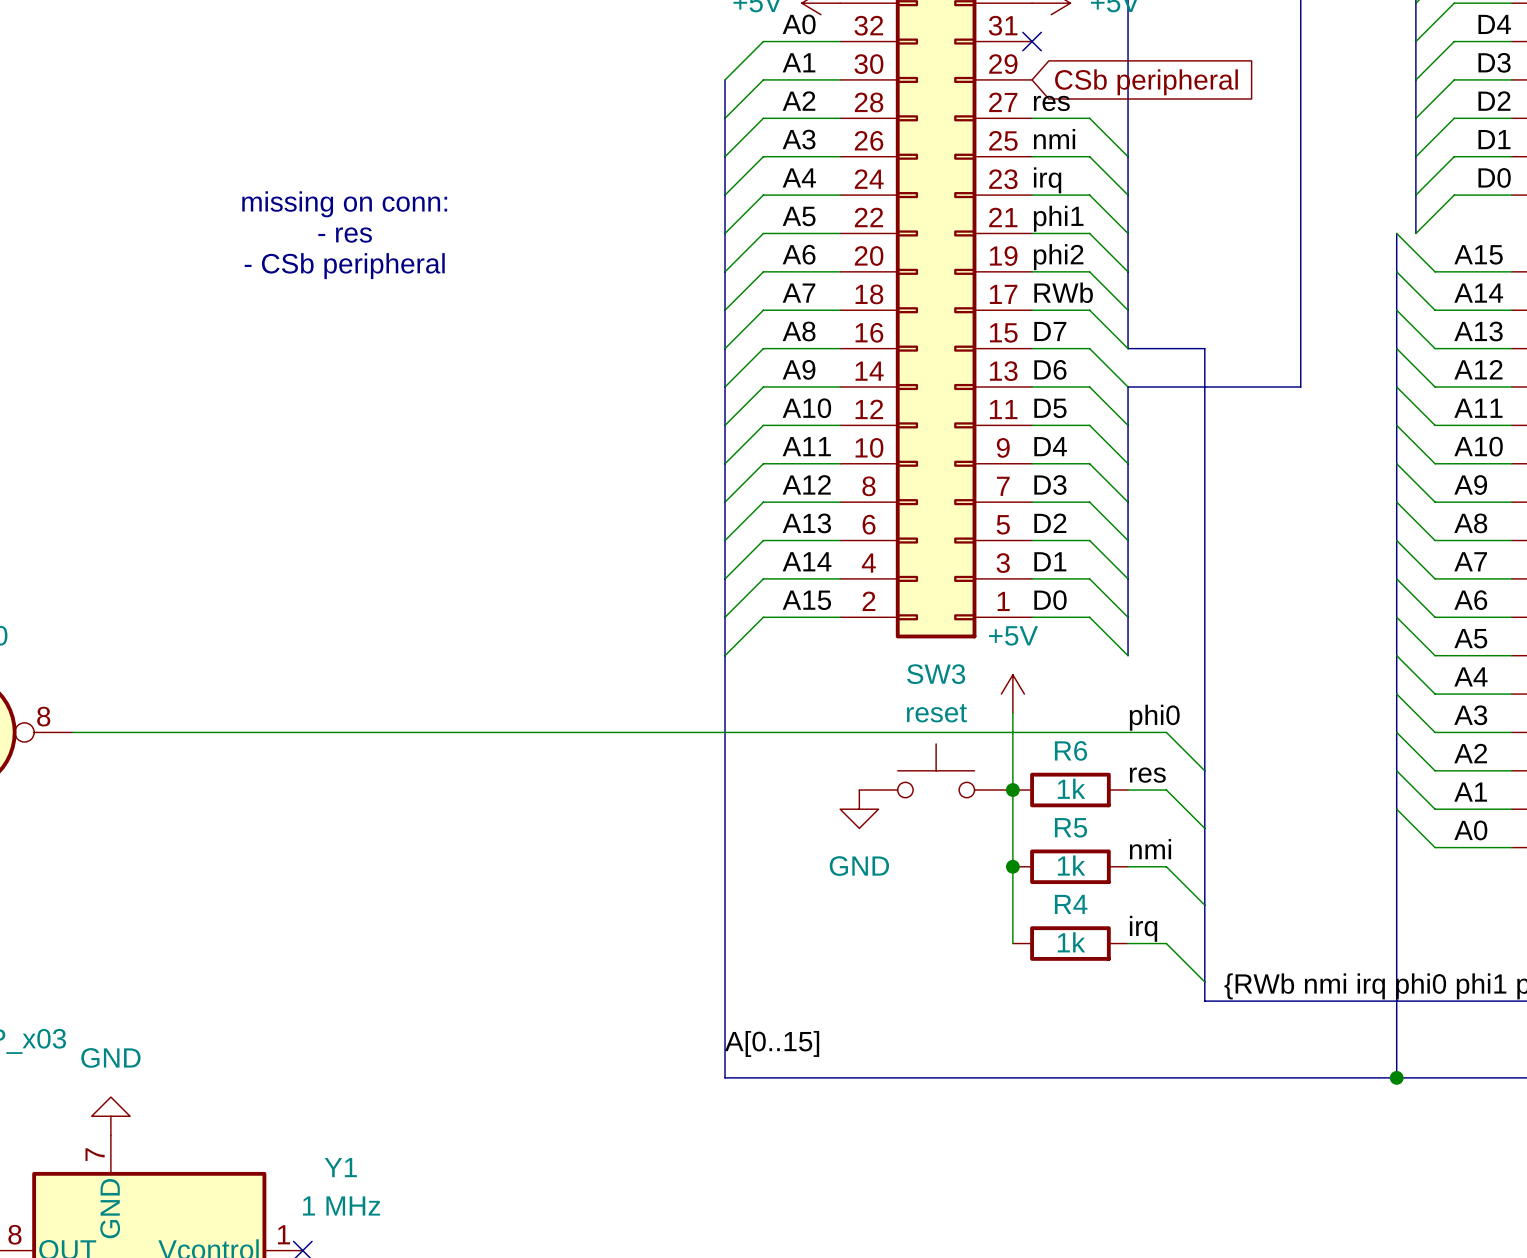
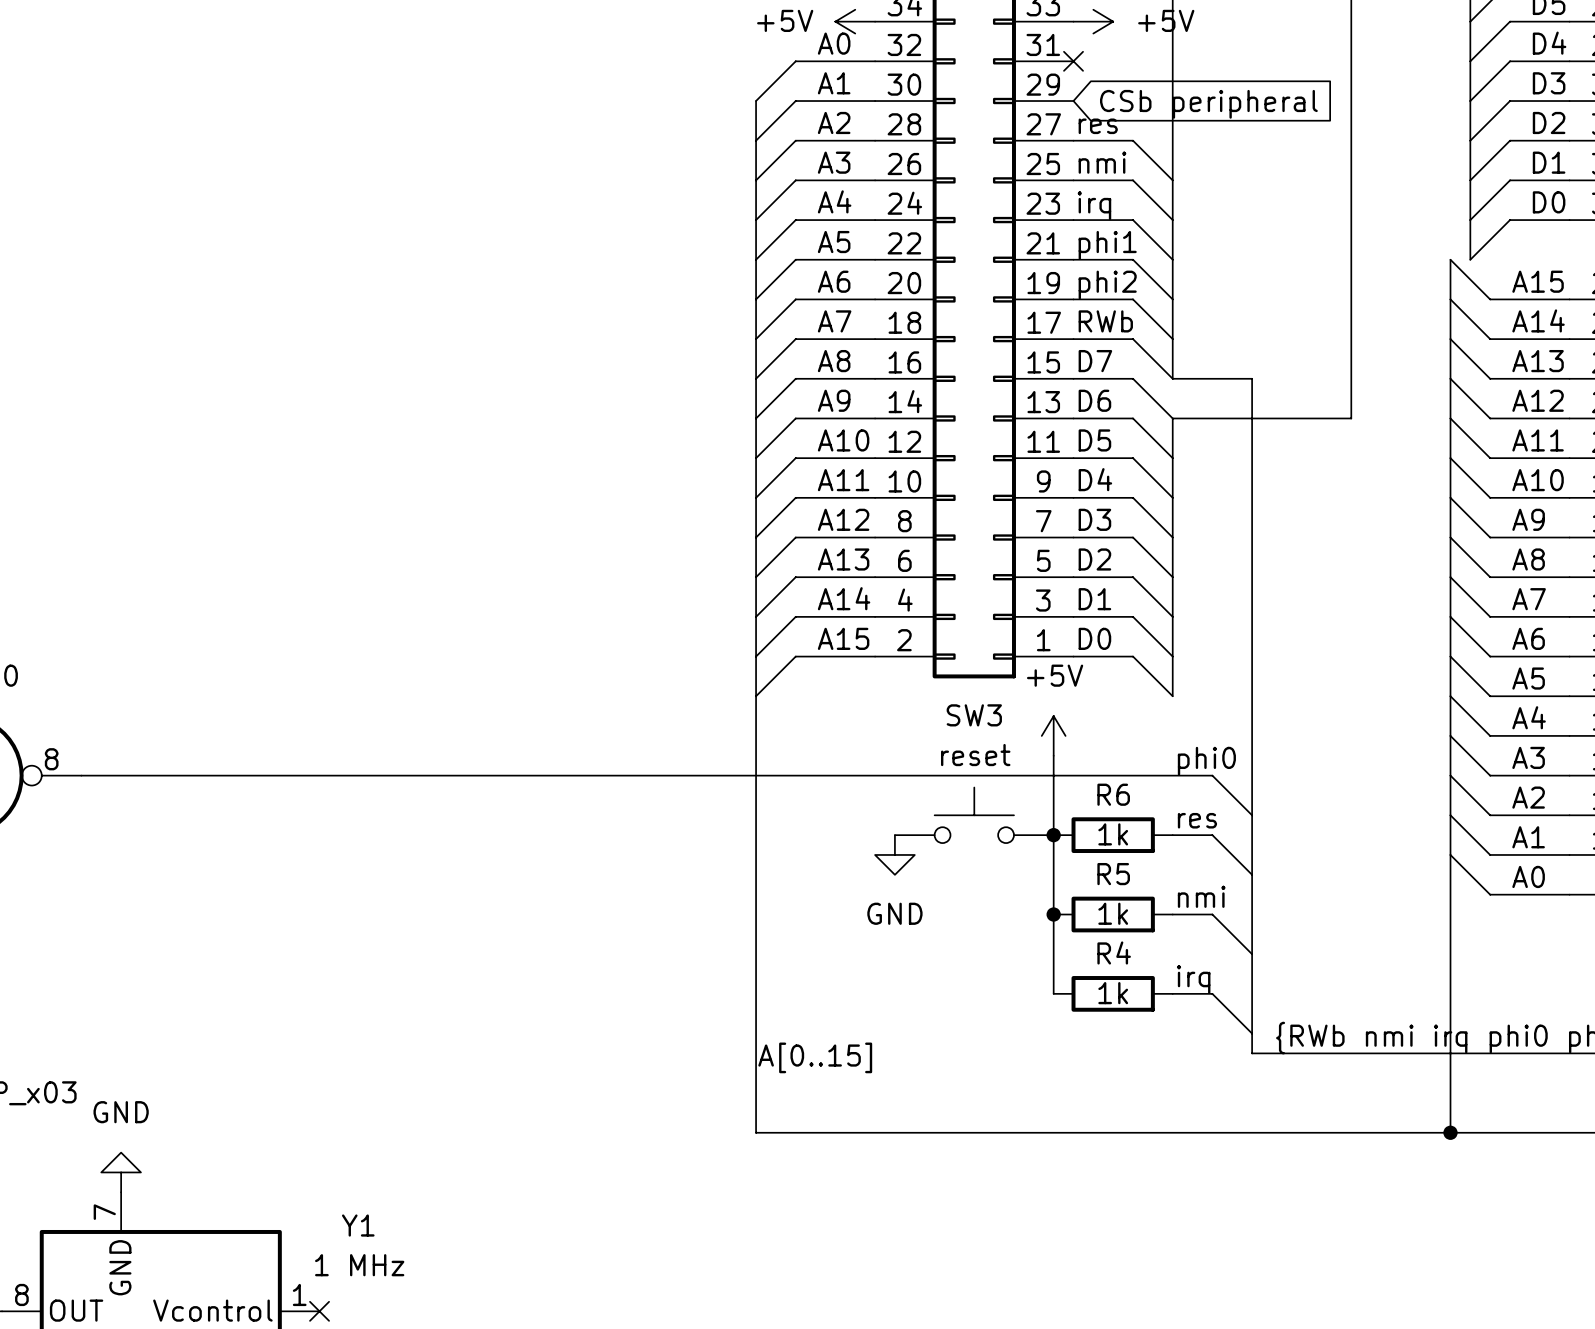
text: missing on conn: (344, 204) -> none
text: - res (345, 235) -> none
text: - CSb peripheral (344, 266) -> none
label position: A[0..15] (772, 1043) -> A[0..15] (815, 1057)

